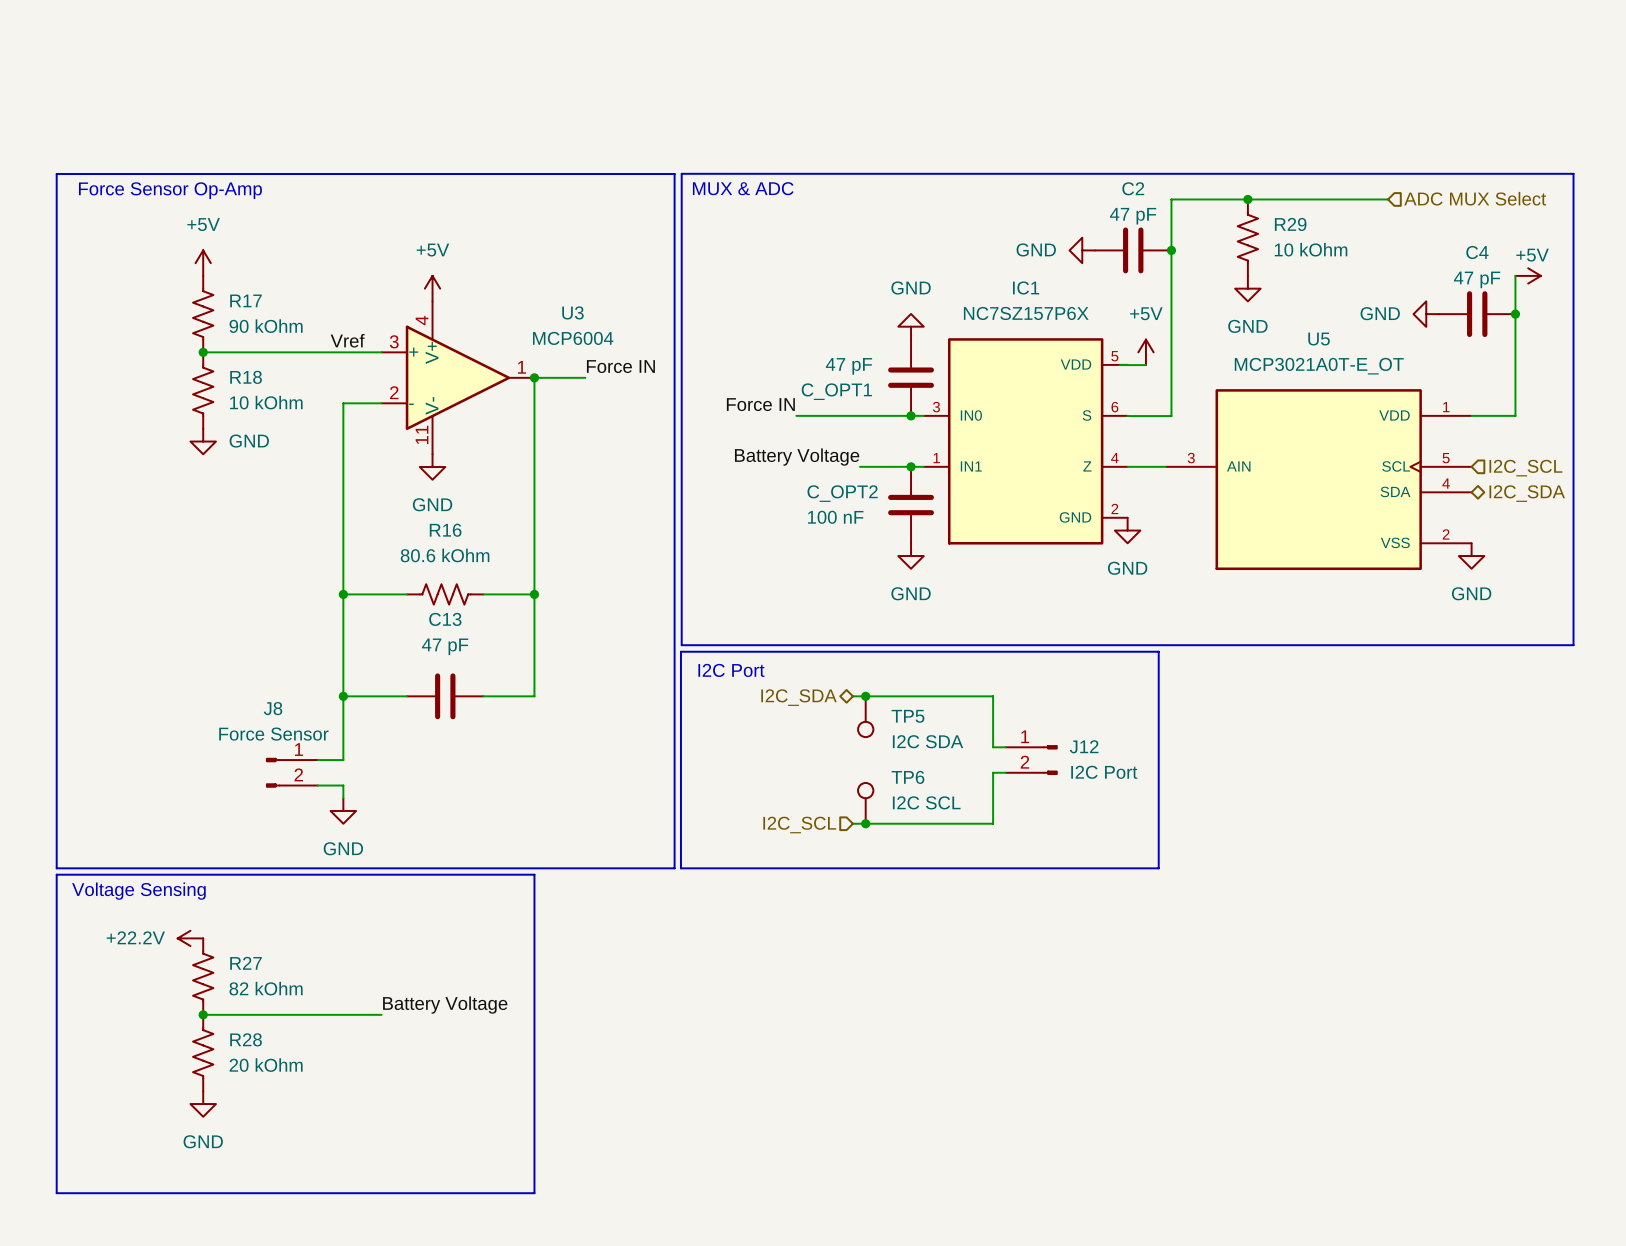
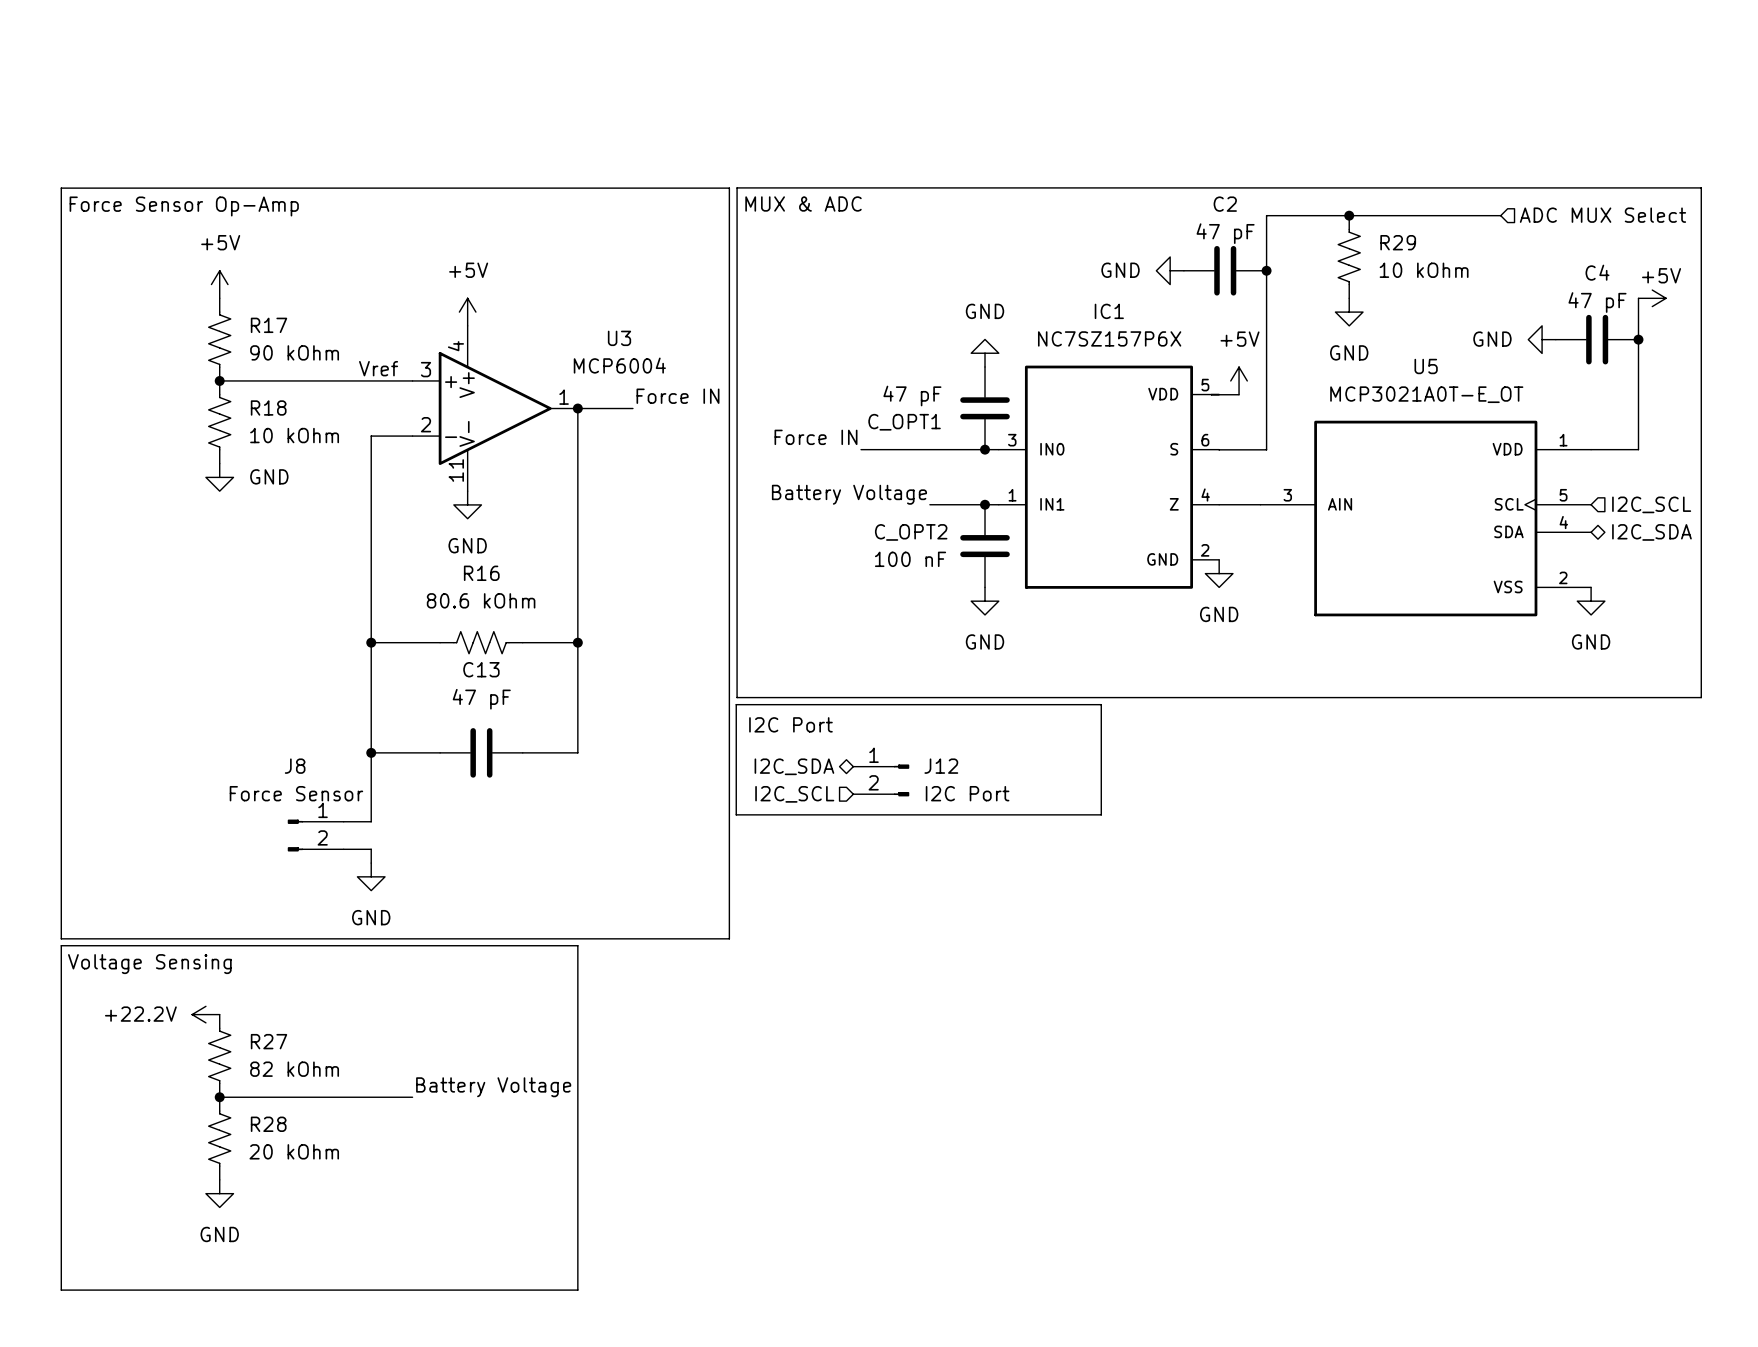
line: (1018, 651) (1158, 651) (1158, 868) (680, 868) (680, 753) -> (1101, 704) (1101, 814) (736, 814)
wire: (852, 696) (993, 696) (993, 747) (1005, 747) -> none
junction: (865, 696) -> none
hierarchical label position: I2C_SDA (799, 697) -> I2C_SDA (794, 766)
TP5: I2C SDA (865, 716) -> none
J12 position: (1031, 760) -> (881, 780)
wire: (1005, 772) (993, 772) (993, 823) (852, 823) -> none
TP6: I2C SCL (865, 803) -> none
junction: (865, 823) -> none
hierarchical label position: I2C_SCL (799, 825) -> I2C_SCL (794, 794)

